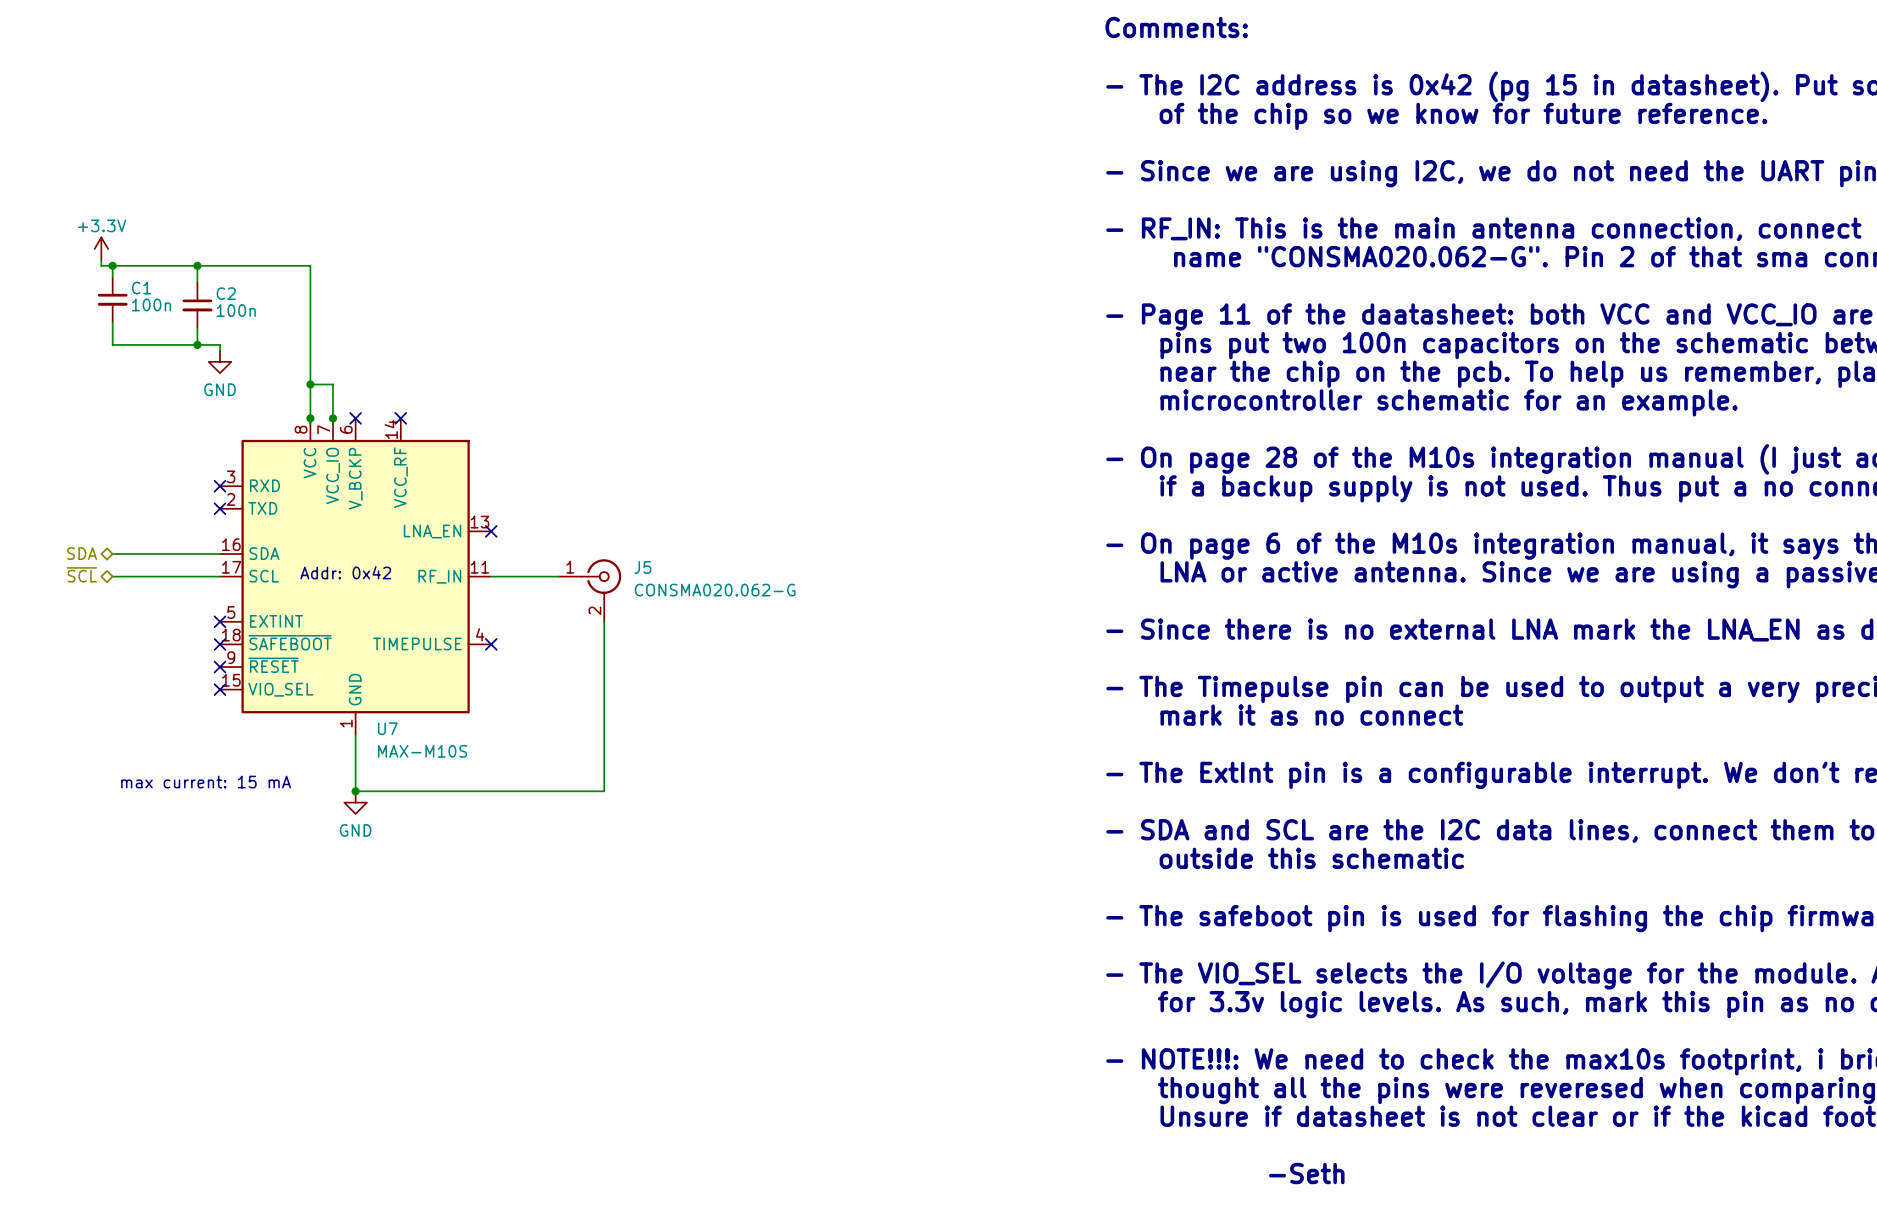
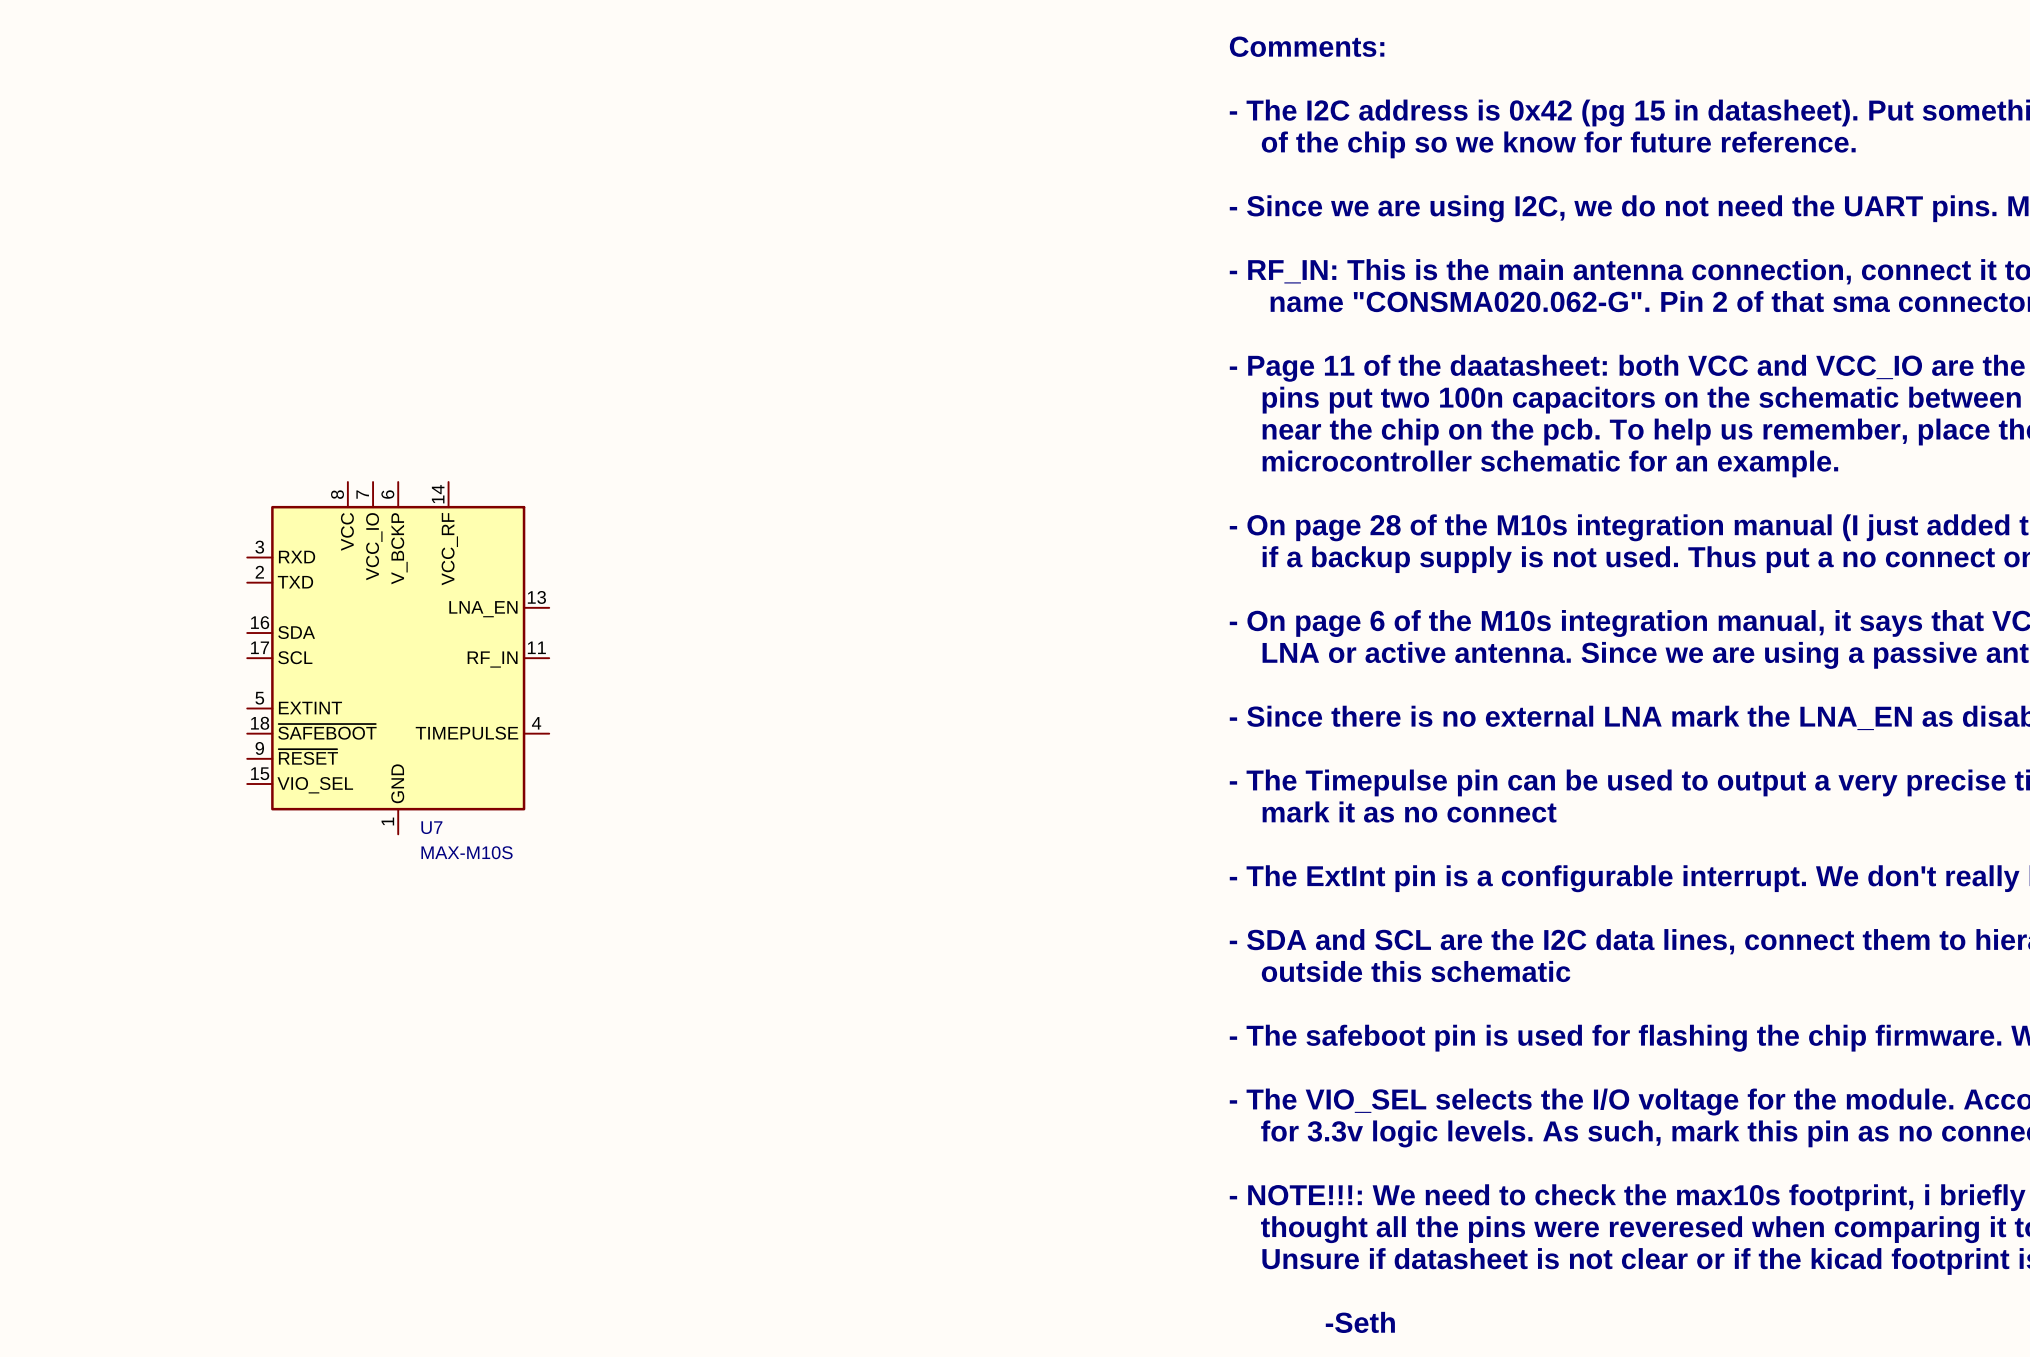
power symbol: +3.3V (101, 248) -> none
wire: (101, 260) (101, 265) (310, 265) (310, 424) -> none
wire: (112, 265) (112, 277) -> none
junction: (112, 265) -> none
wire: (197, 265) (197, 282) -> none
junction: (197, 265) -> none
C1: 100n (112, 299) -> none
C2: 100n (197, 305) -> none
wire: (112, 322) (112, 344) (220, 344) (220, 350) -> none
wire: (197, 327) (197, 344) -> none
junction: (197, 344) -> none
power symbol: GND (220, 361) -> none
wire: (310, 384) (333, 384) (333, 424) -> none
junction: (310, 384) -> none
junction: (310, 418) -> none
junction: (333, 418) -> none
no-connect mark: (355, 418) -> none
no-connect mark: (400, 418) -> none
no-connect mark: (220, 486) -> none
no-connect mark: (220, 508) -> none
no-connect mark: (491, 531) -> none
hierarchical label: SDA (82, 553) -> none
wire: (112, 554) (220, 554) -> none
text: Addr: 0x42 (345, 572) -> none
hierarchical label: ~{SCL} (81, 574) -> none
wire: (112, 576) (220, 576) -> none
wire: (491, 576) (559, 576) -> none
J5: CONSMA020.062-G (590, 590) -> none
no-connect mark: (220, 621) -> none
wire: (604, 621) (604, 791) (355, 791) (355, 734) -> none
no-connect mark: (220, 644) -> none
no-connect mark: (491, 644) -> none
no-connect mark: (220, 667) -> none
no-connect mark: (220, 689) -> none
text: max current: 15 mA (206, 782) -> none
junction: (355, 791) -> none
power symbol: GND (355, 802) -> none

